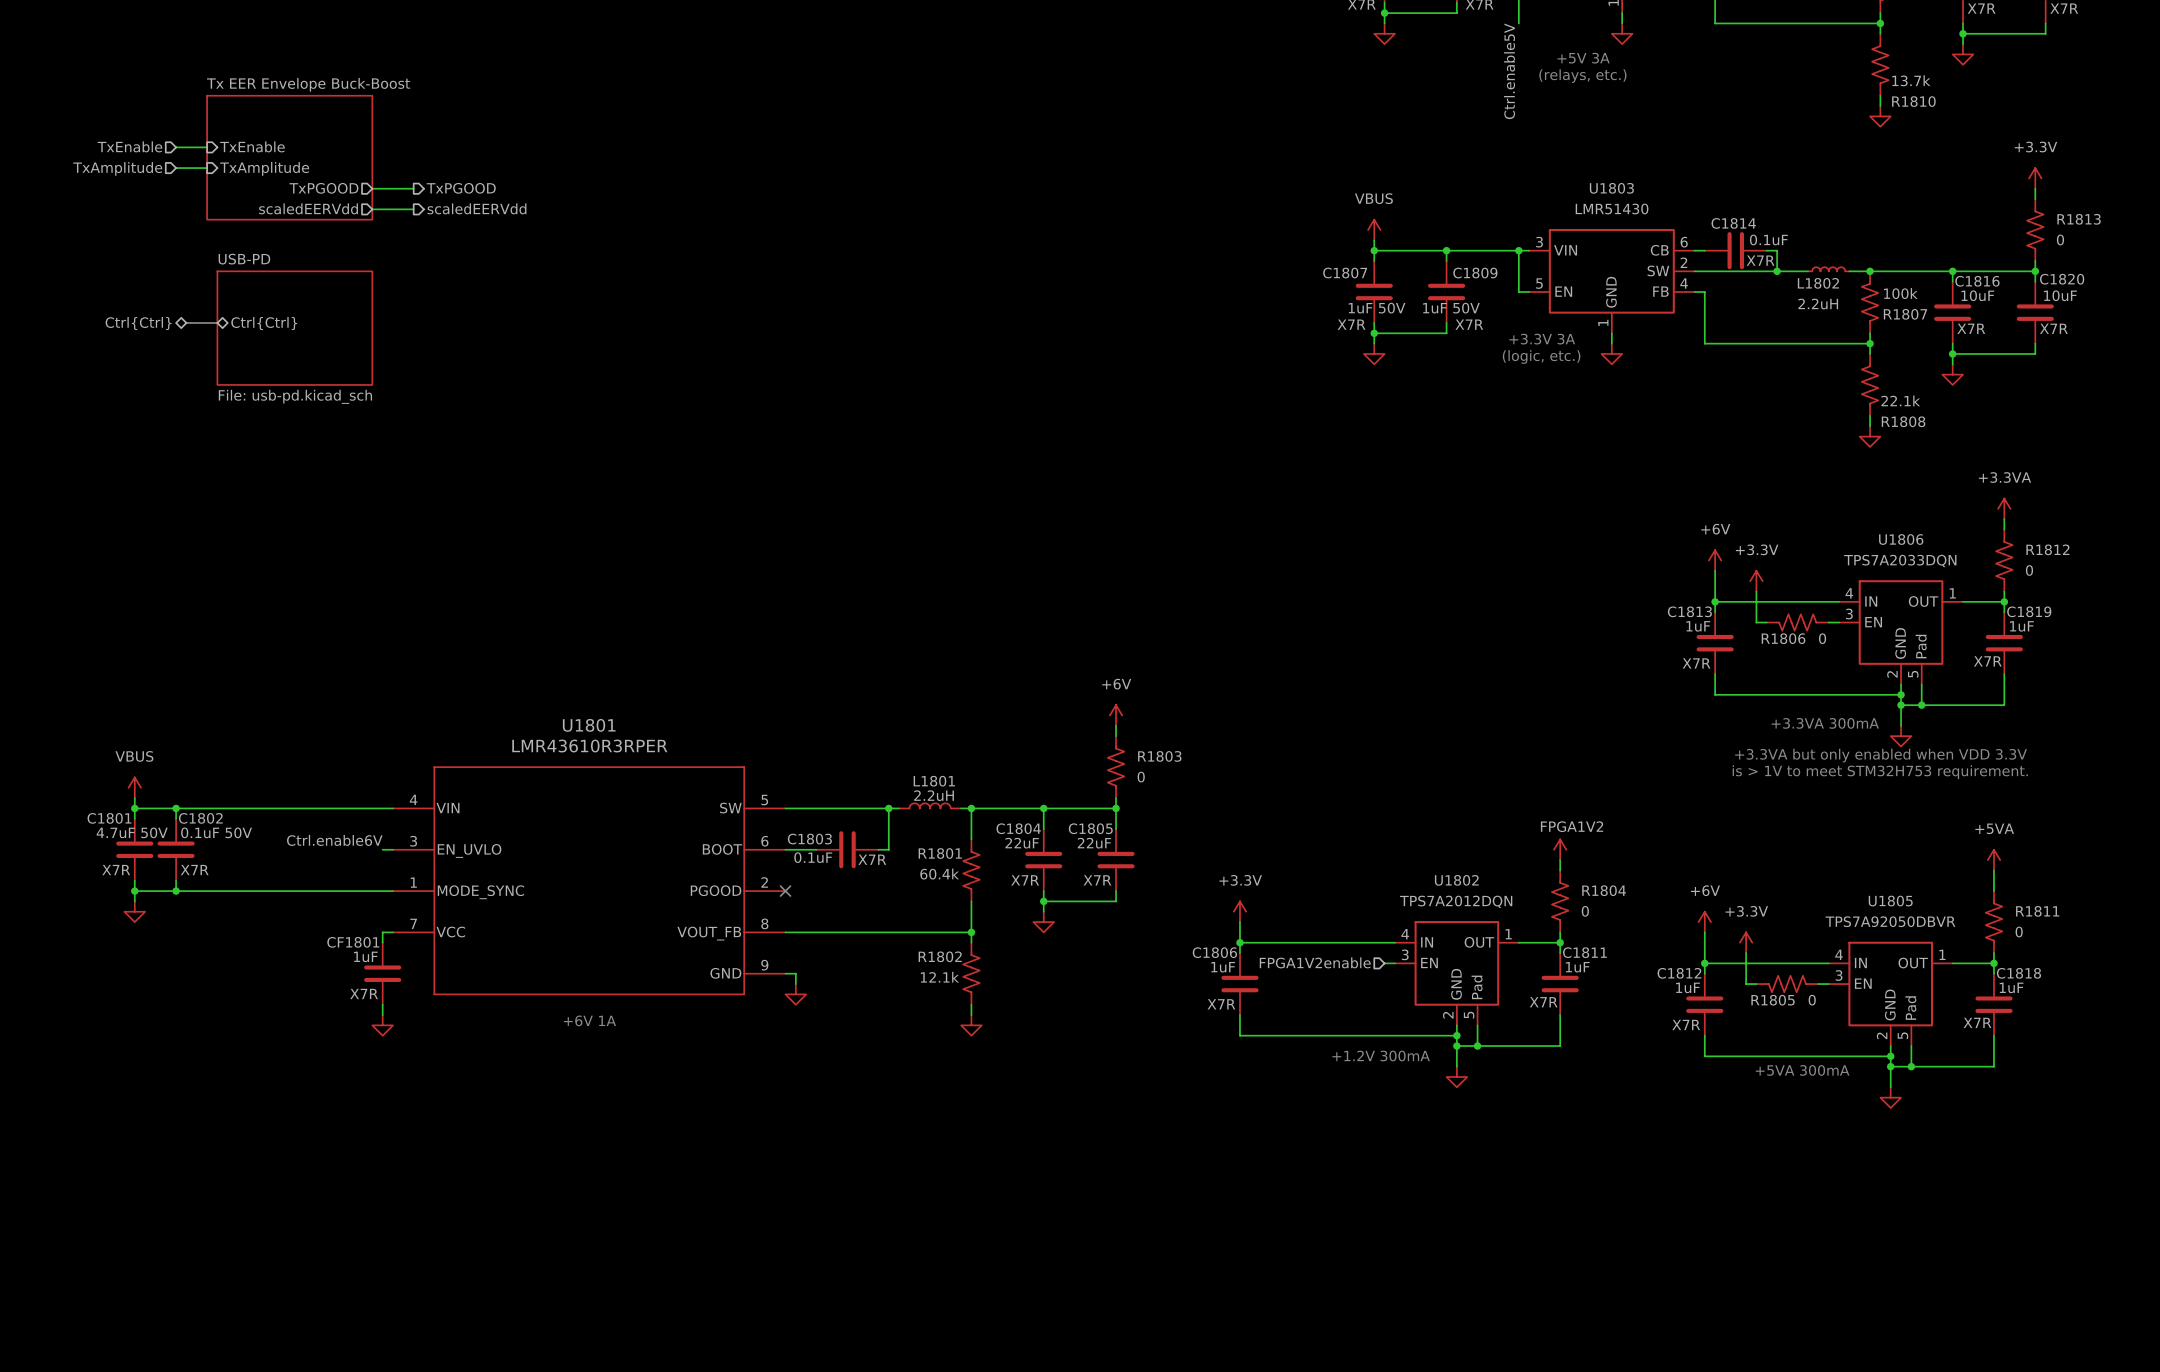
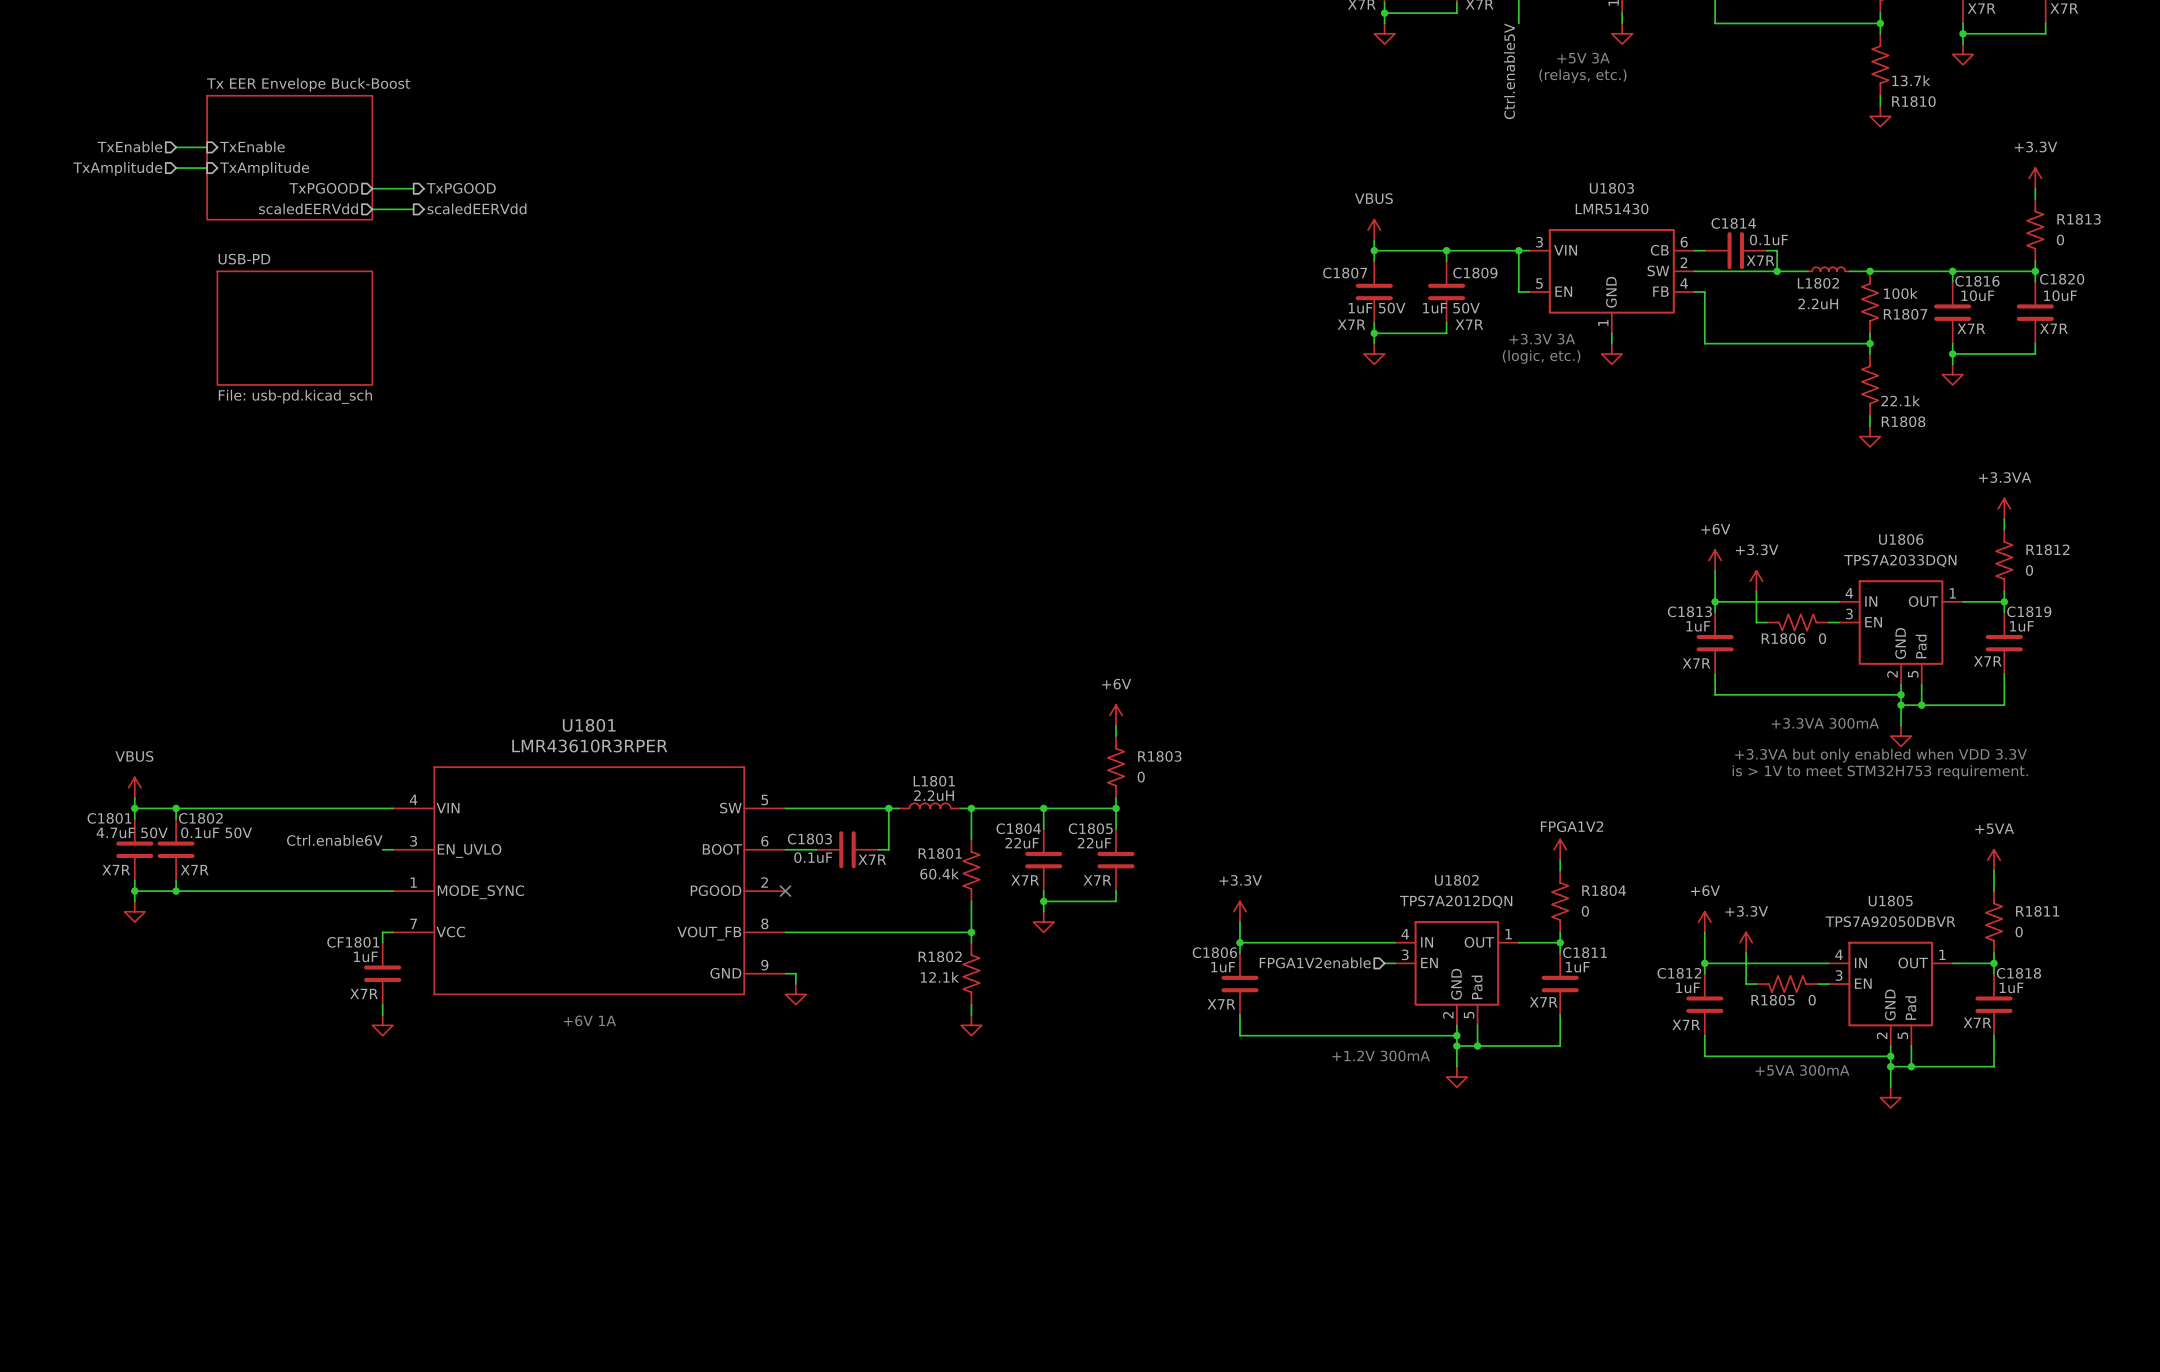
bus: (186, 322) (217, 322) -> none
hierarchical label: Ctrl{Ctrl} (138, 323) -> none
sheet pin: Ctrl{Ctrl} (264, 323) -> none

